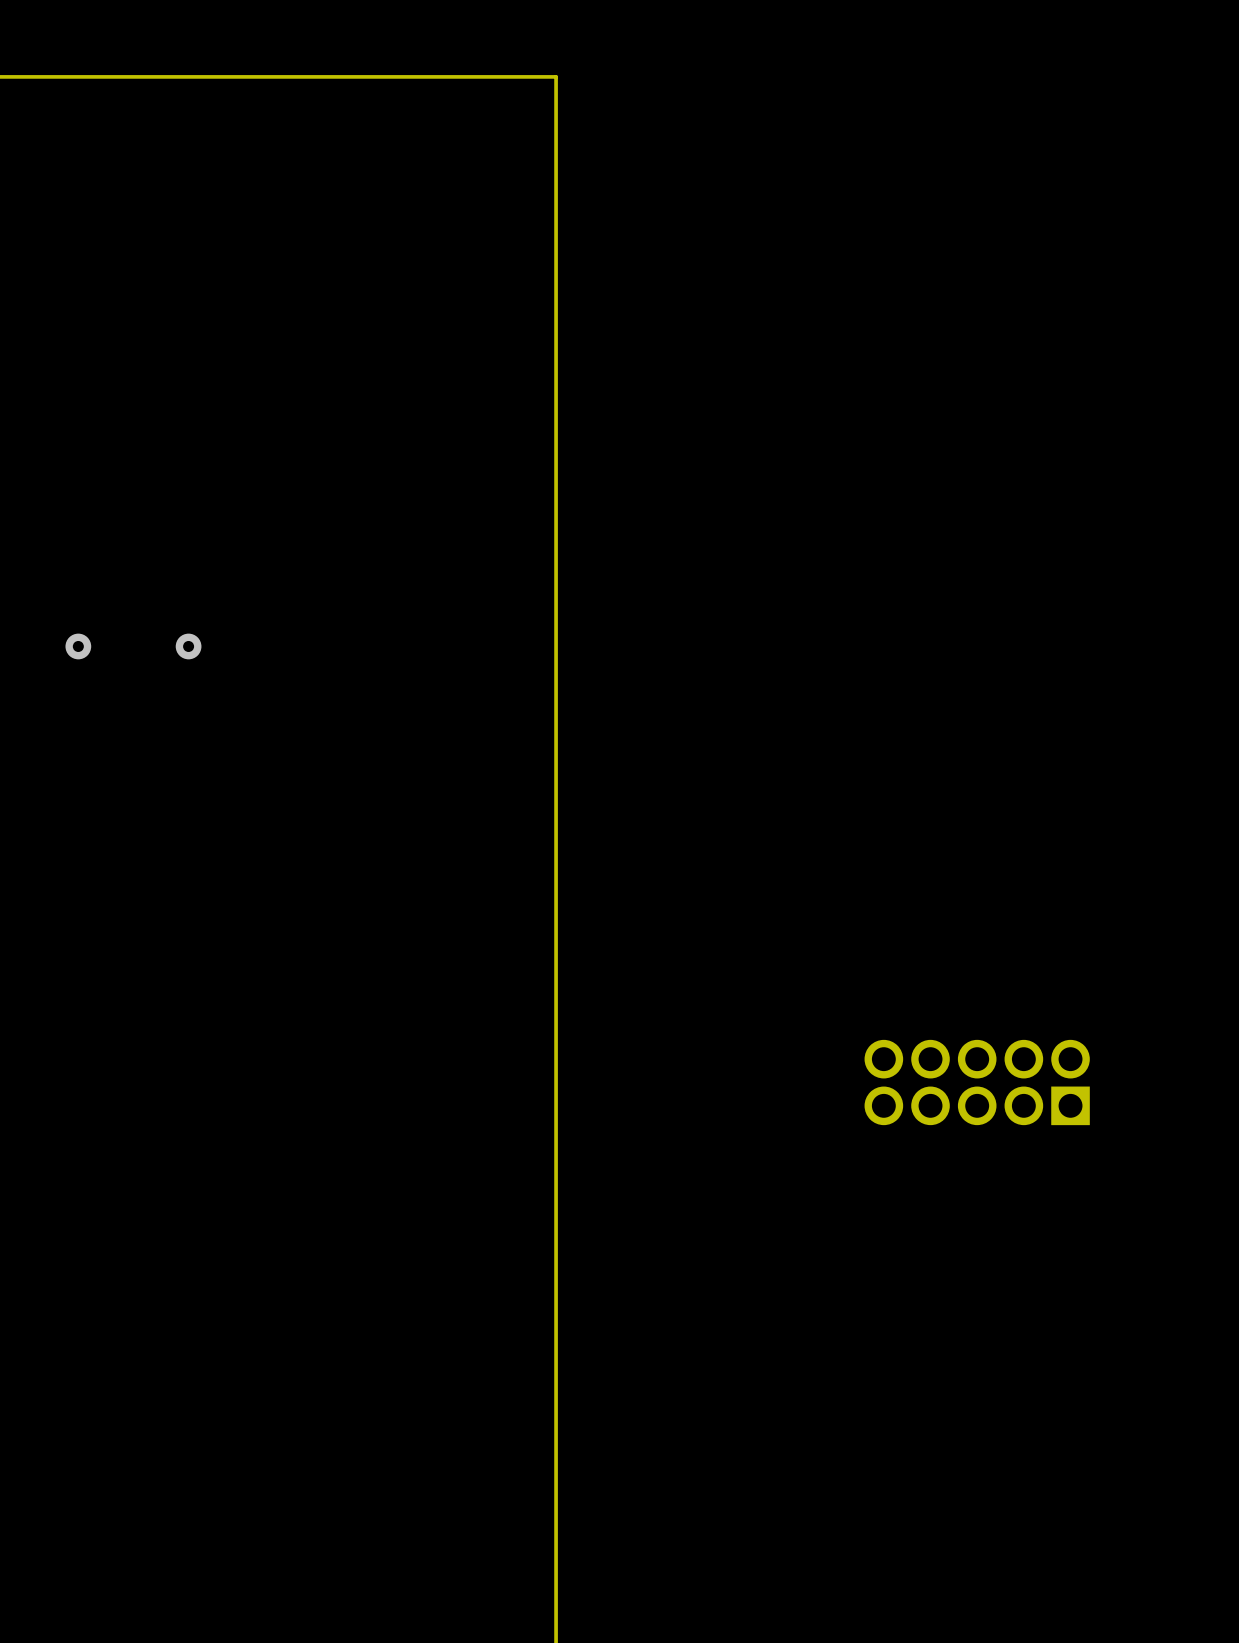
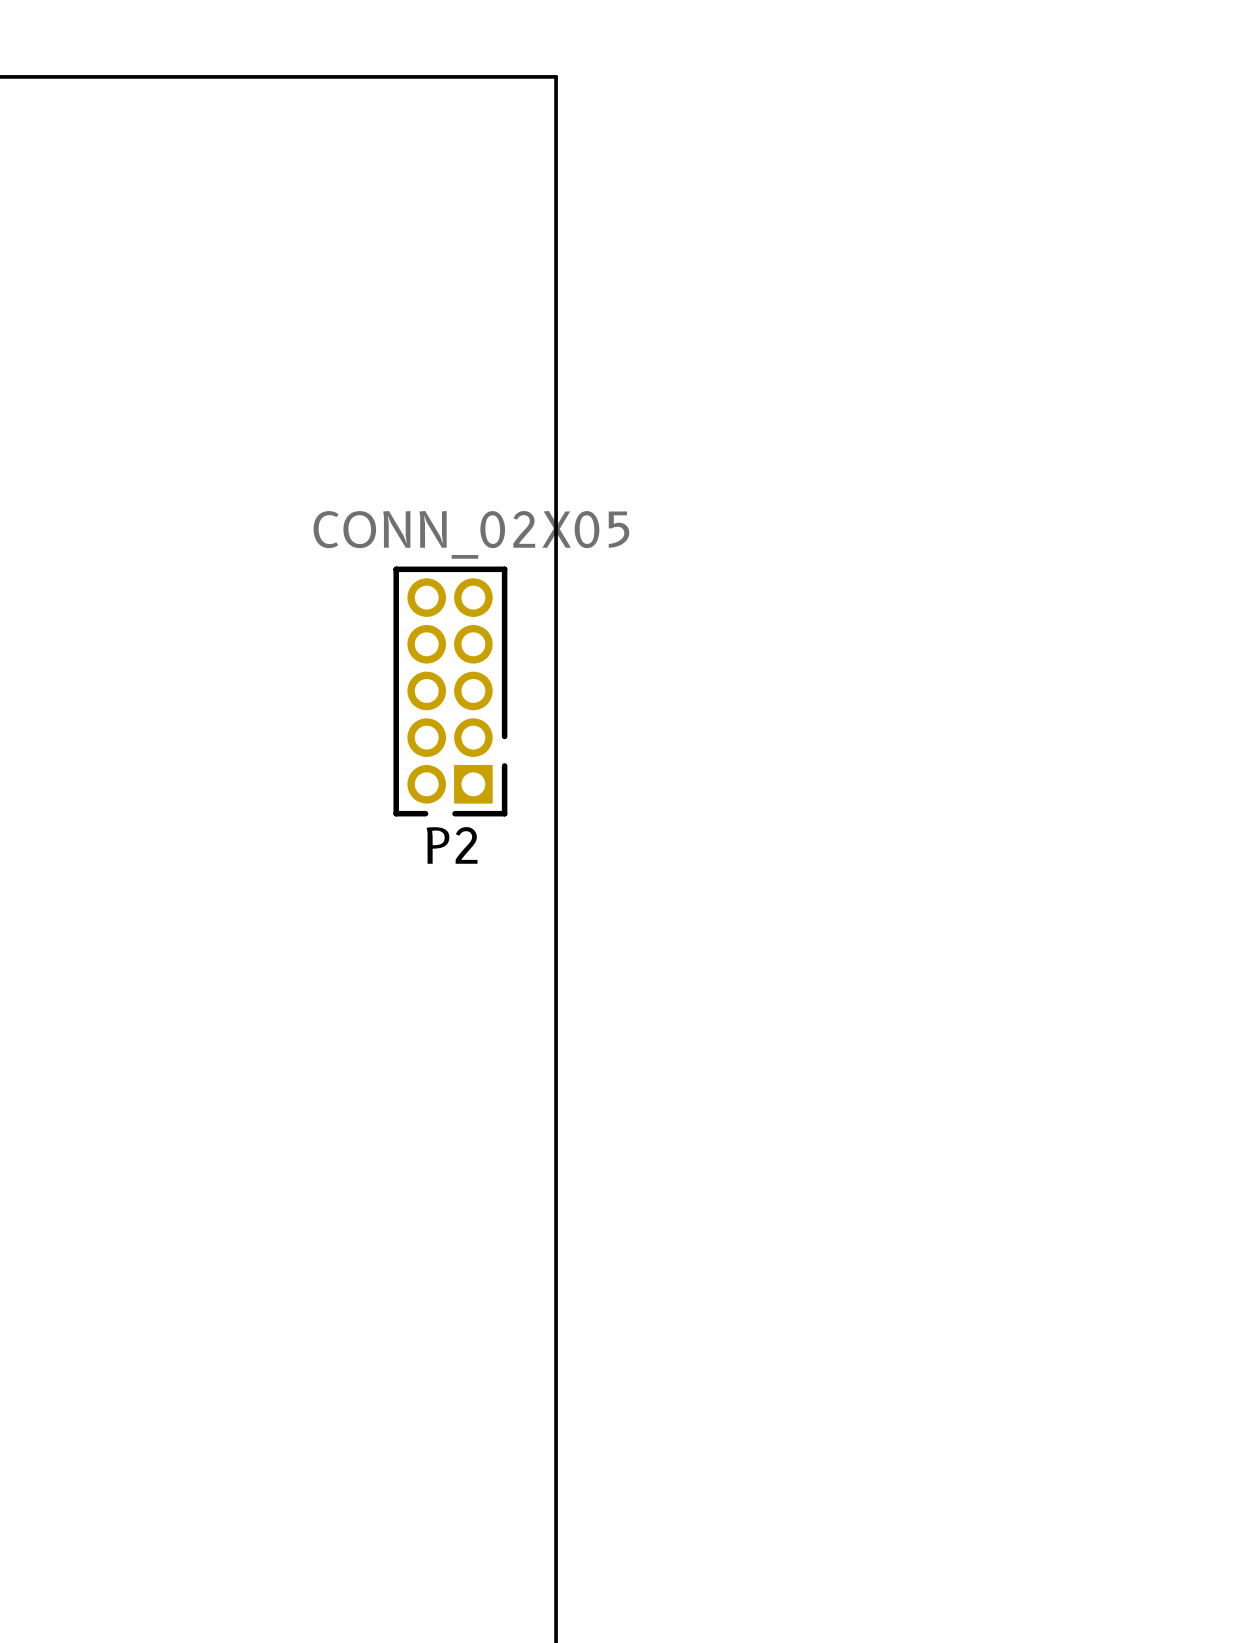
via: (78, 646) -> none
via: (188, 646) -> none
P2 side: top (977, 1082) -> bottom (450, 691)

